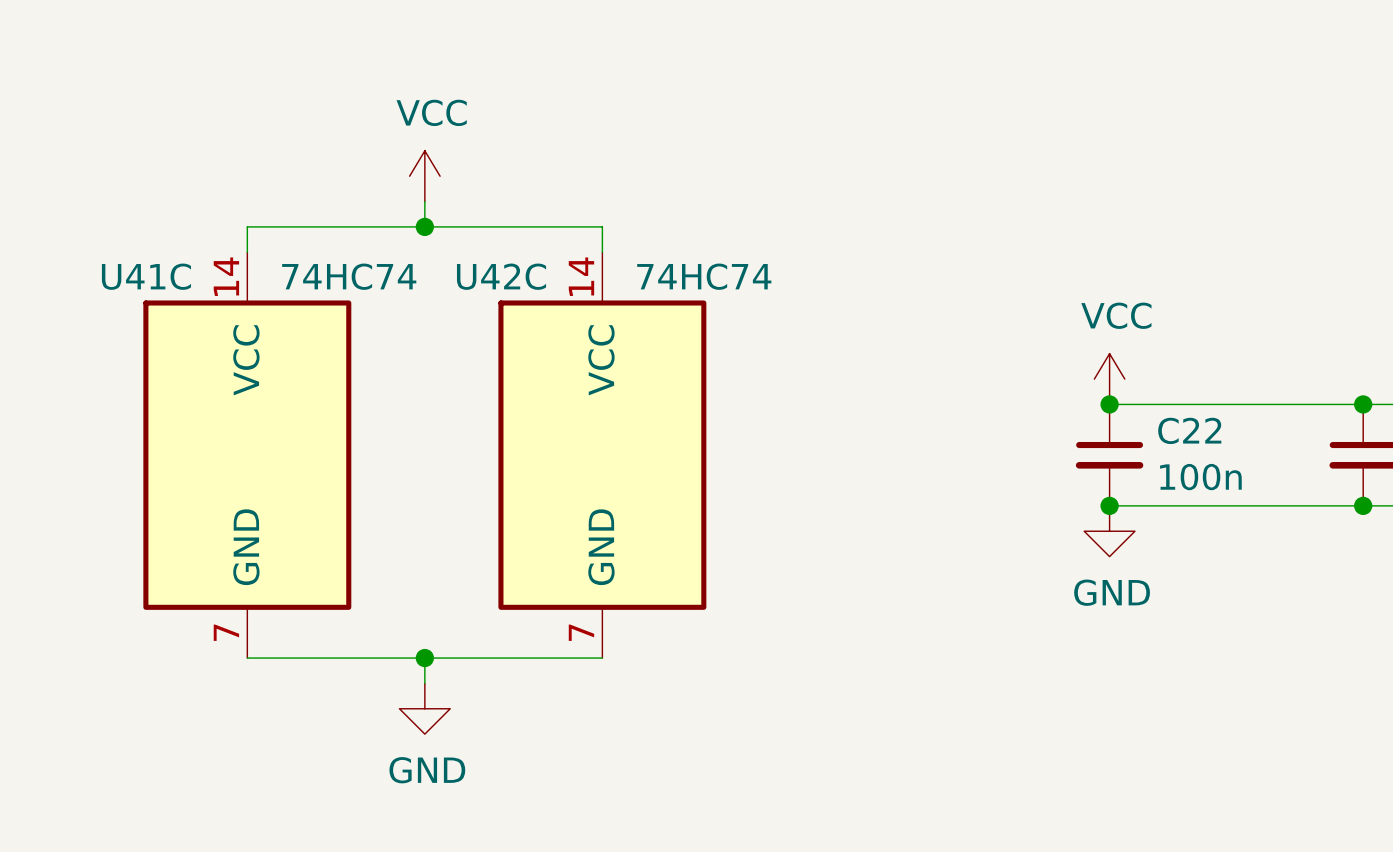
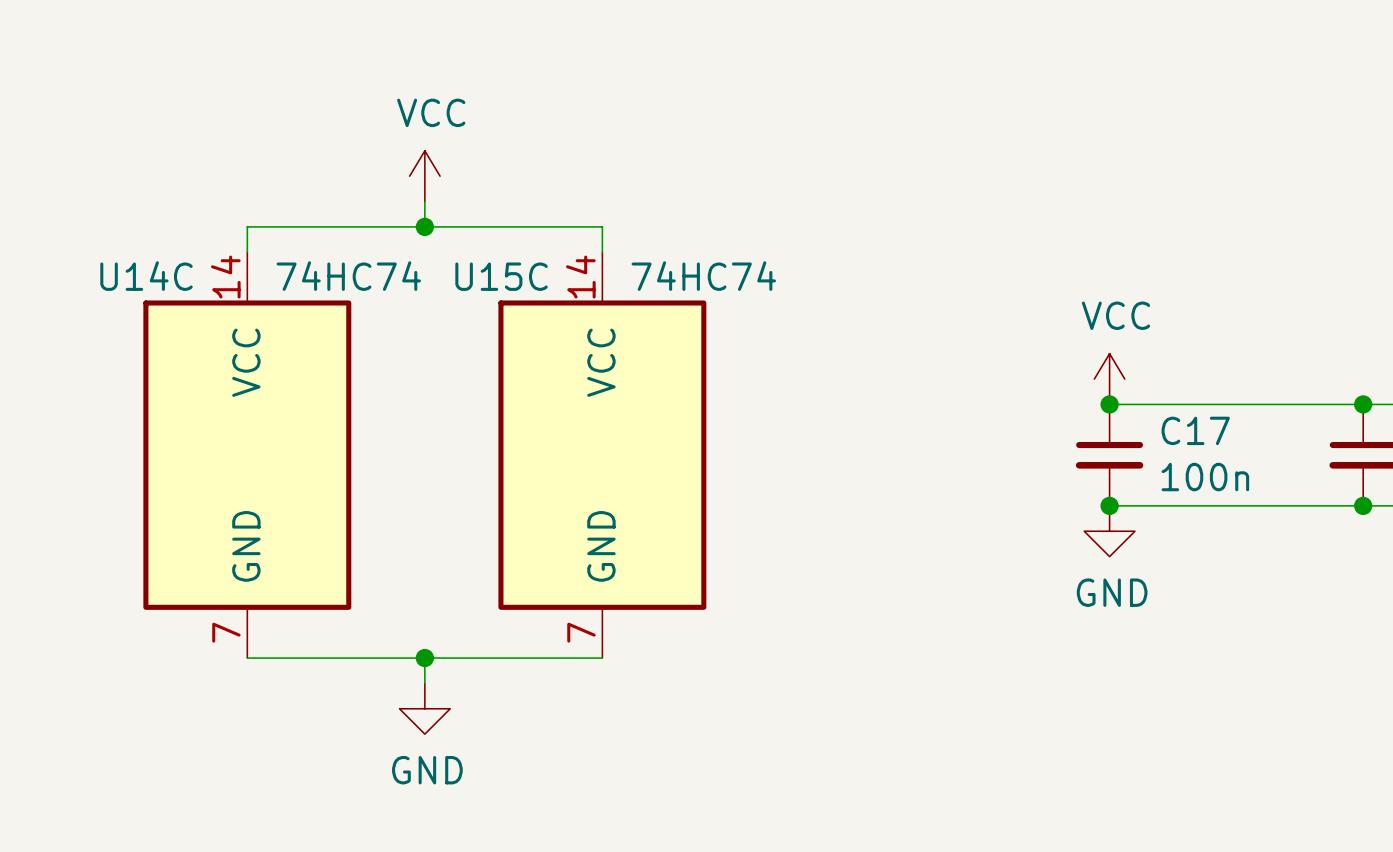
U41C name: U41C (146, 276) -> U14C (146, 276)
U42C name: U42C (501, 276) -> U15C (501, 276)
C22 name: C22 (1189, 430) -> C17 (1195, 430)

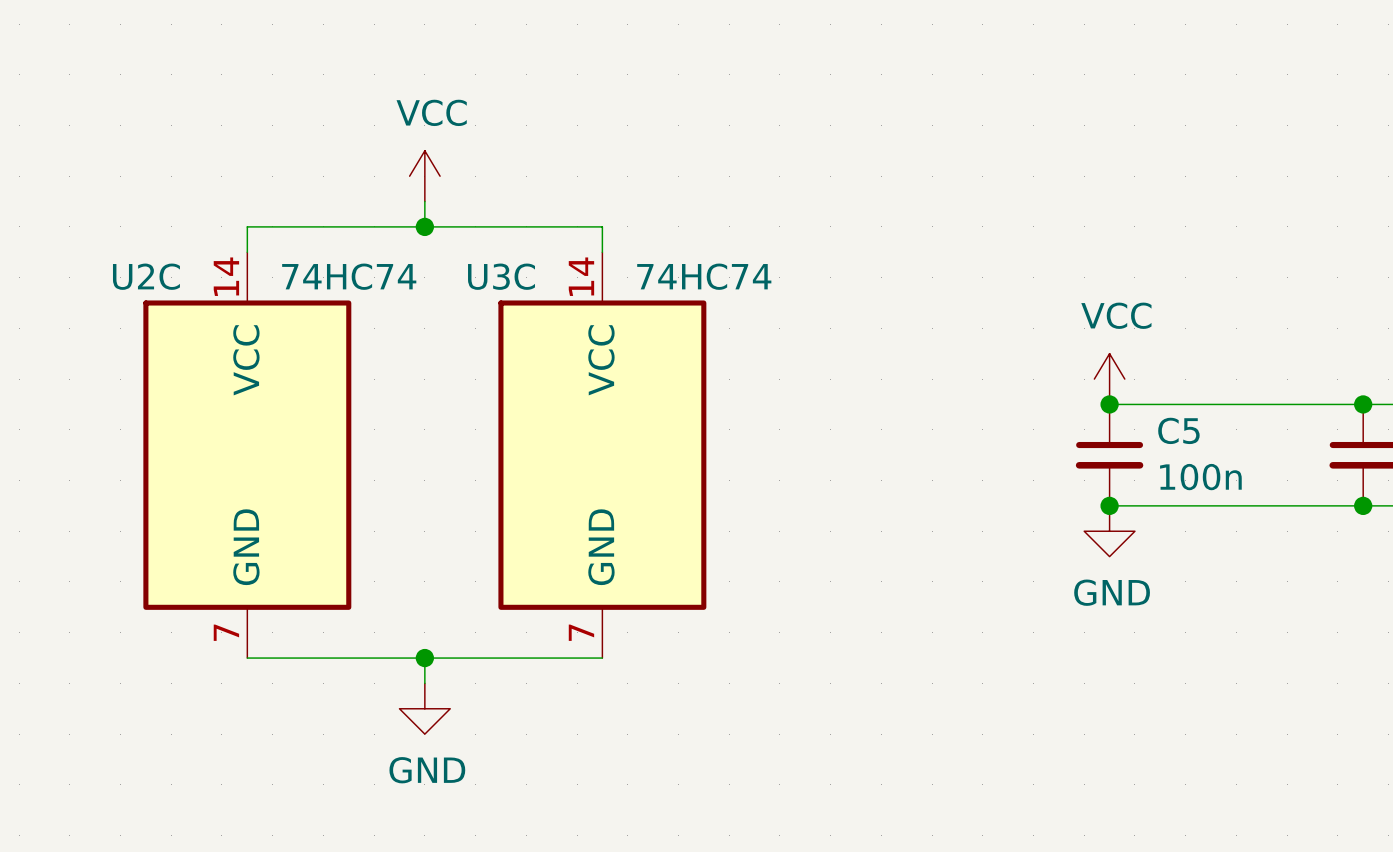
U14C name: U14C (146, 276) -> U2C (146, 276)
U15C name: U15C (501, 276) -> U3C (501, 276)
C17 name: C17 (1195, 430) -> C5 (1178, 430)

